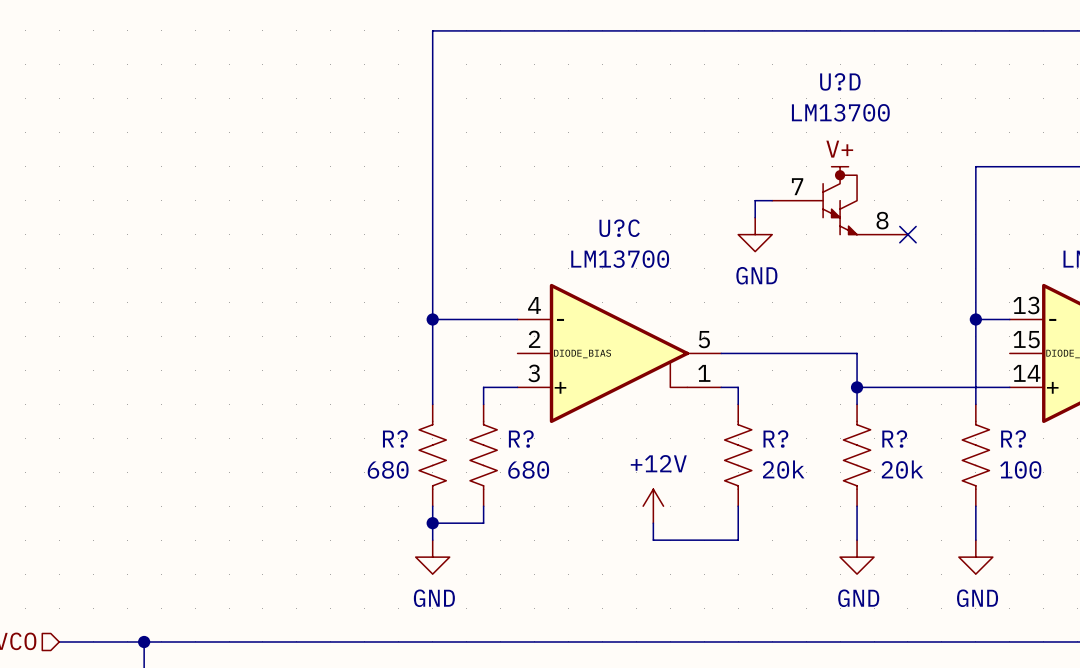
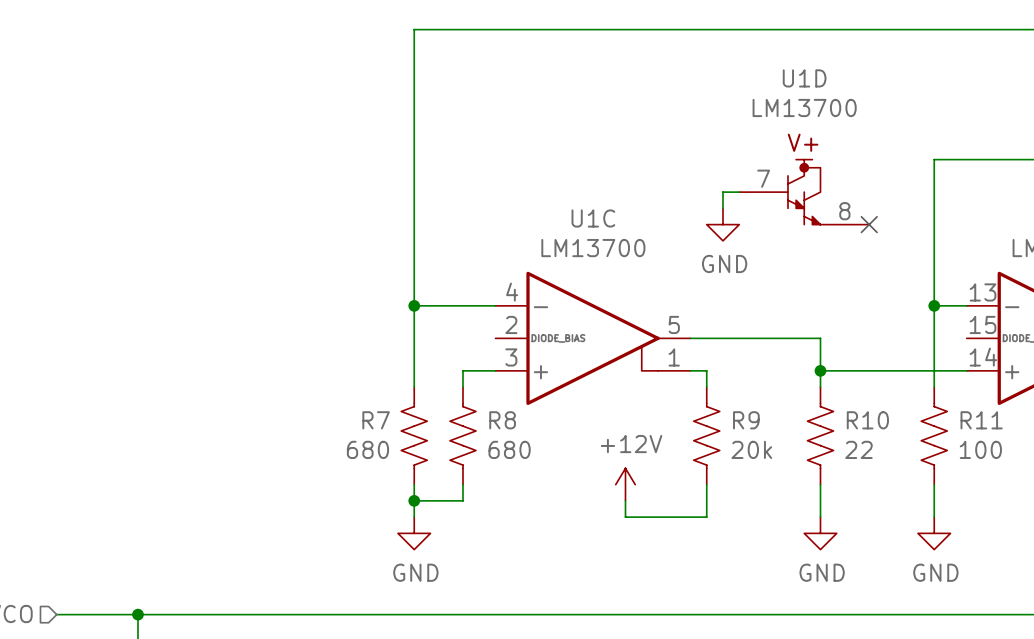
U?D name: U?D (840, 81) -> U1D (804, 78)
U?C name: U?C (619, 228) -> U1C (593, 218)
R? name: R? (395, 439) -> R7 (376, 420)
R? name: R? (521, 439) -> R8 (502, 420)
R? name: R? (775, 439) -> R9 (746, 420)
R? name: R? (894, 439) -> R10 (867, 420)
R? name: R? (1013, 439) -> R11 (981, 420)
R? value: 20k (902, 469) -> 22 (858, 449)

